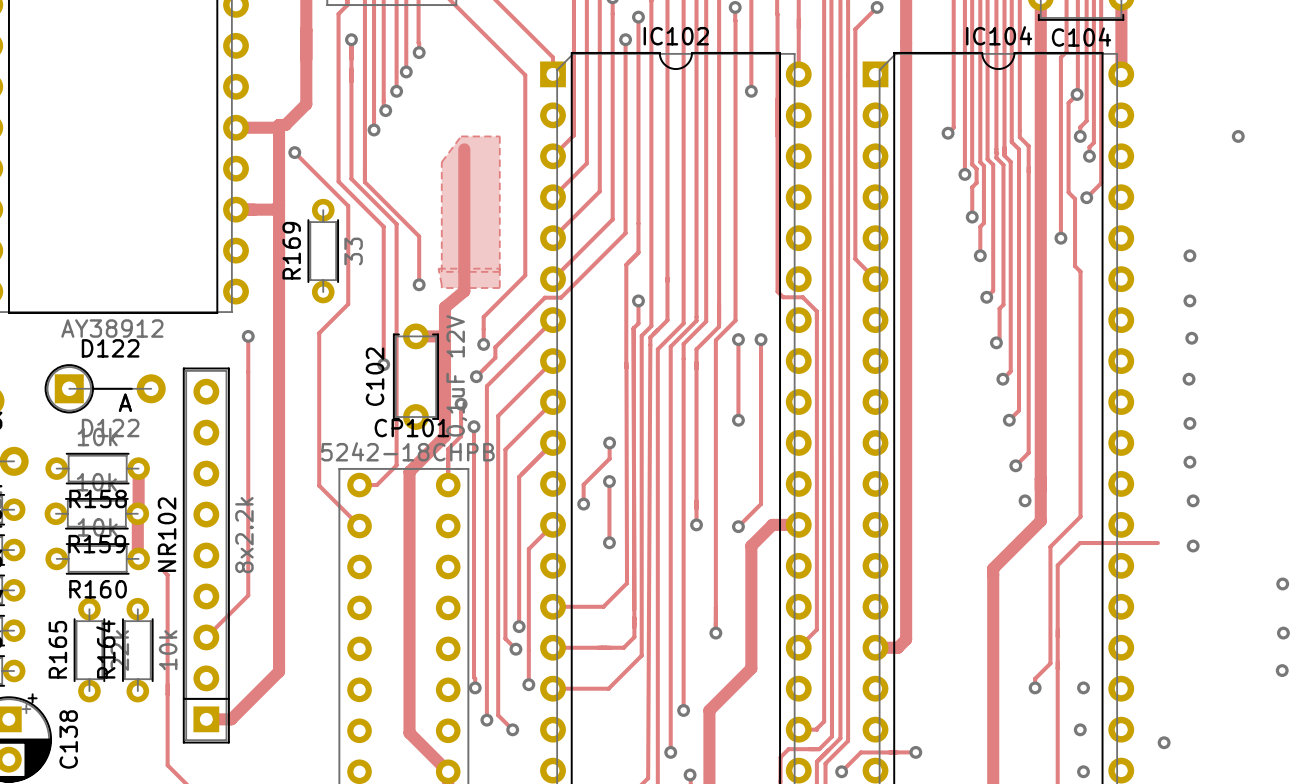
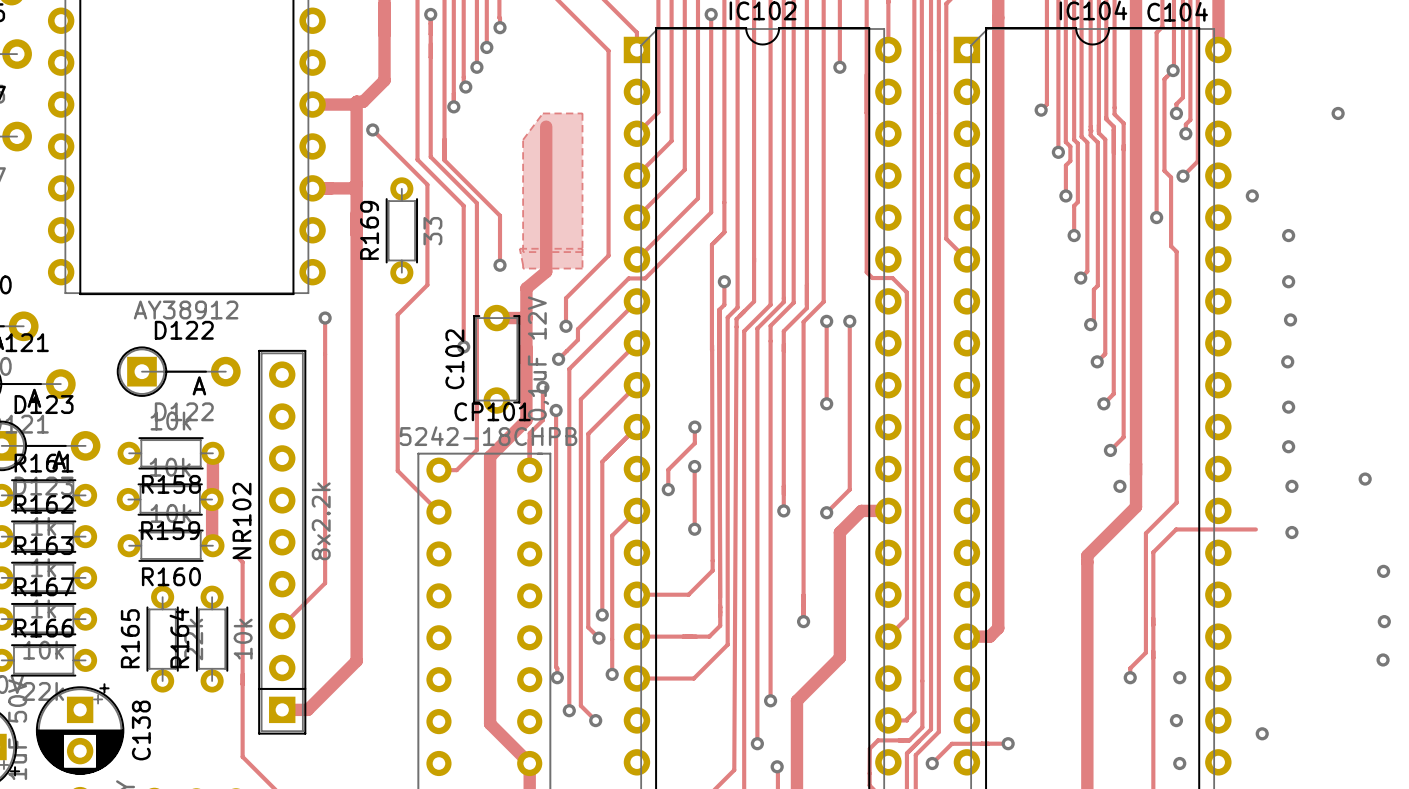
via: none -> (1252, 195)
via: none -> (1365, 479)

